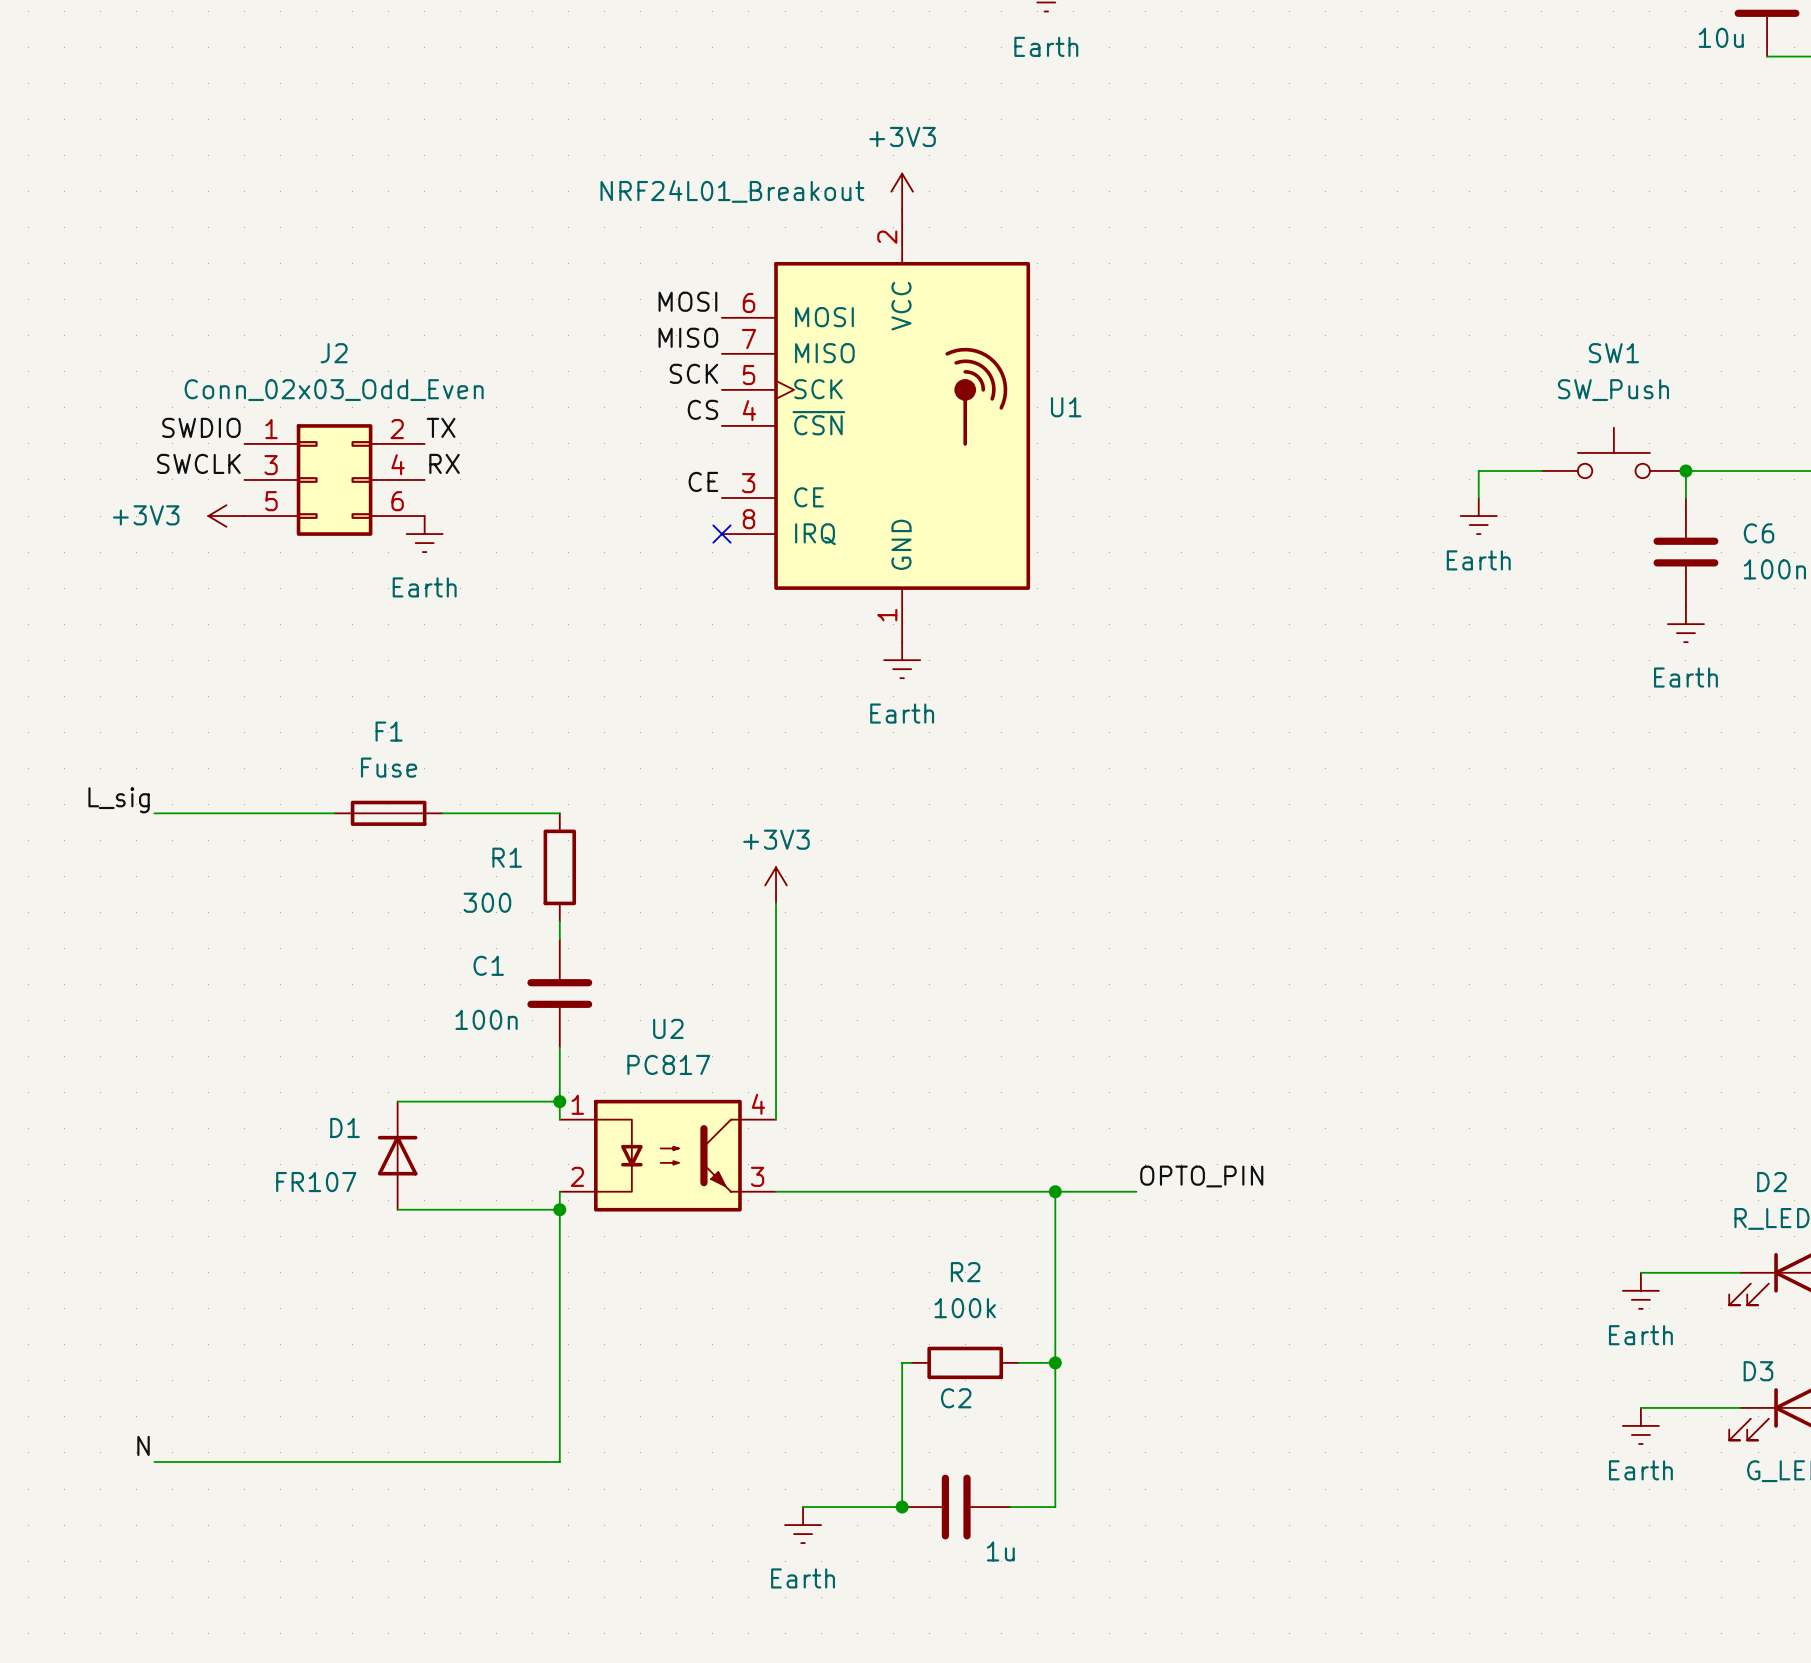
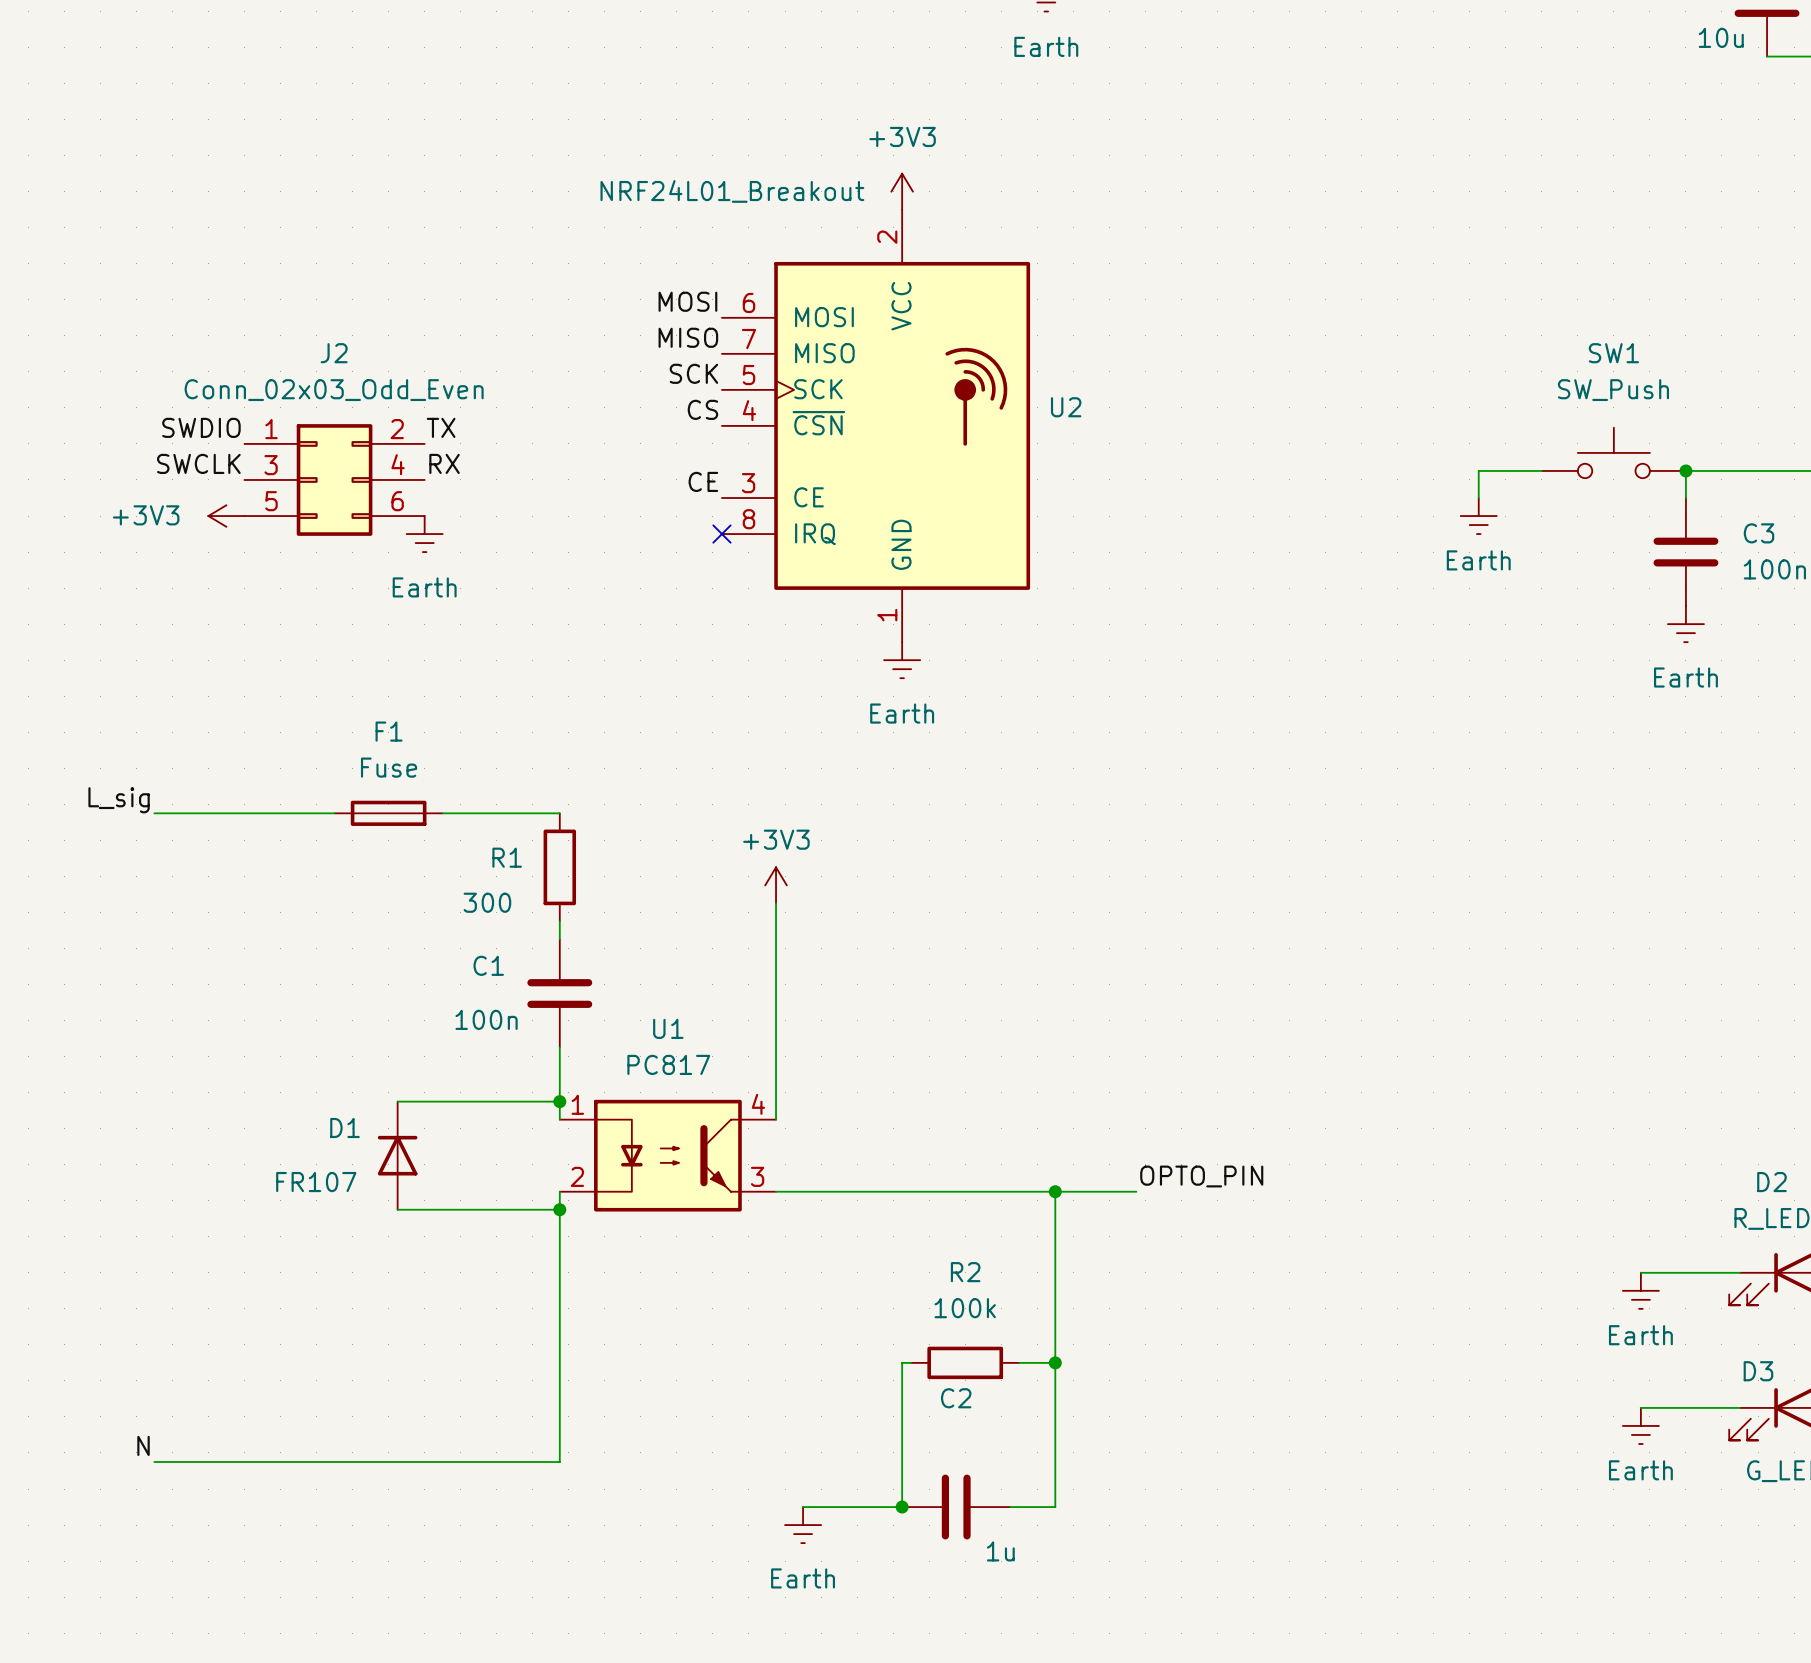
U1 name: U1 (1066, 407) -> U2 (1066, 407)
C6 name: C6 (1759, 533) -> C3 (1759, 533)
U2 name: U2 (668, 1028) -> U1 (668, 1028)

